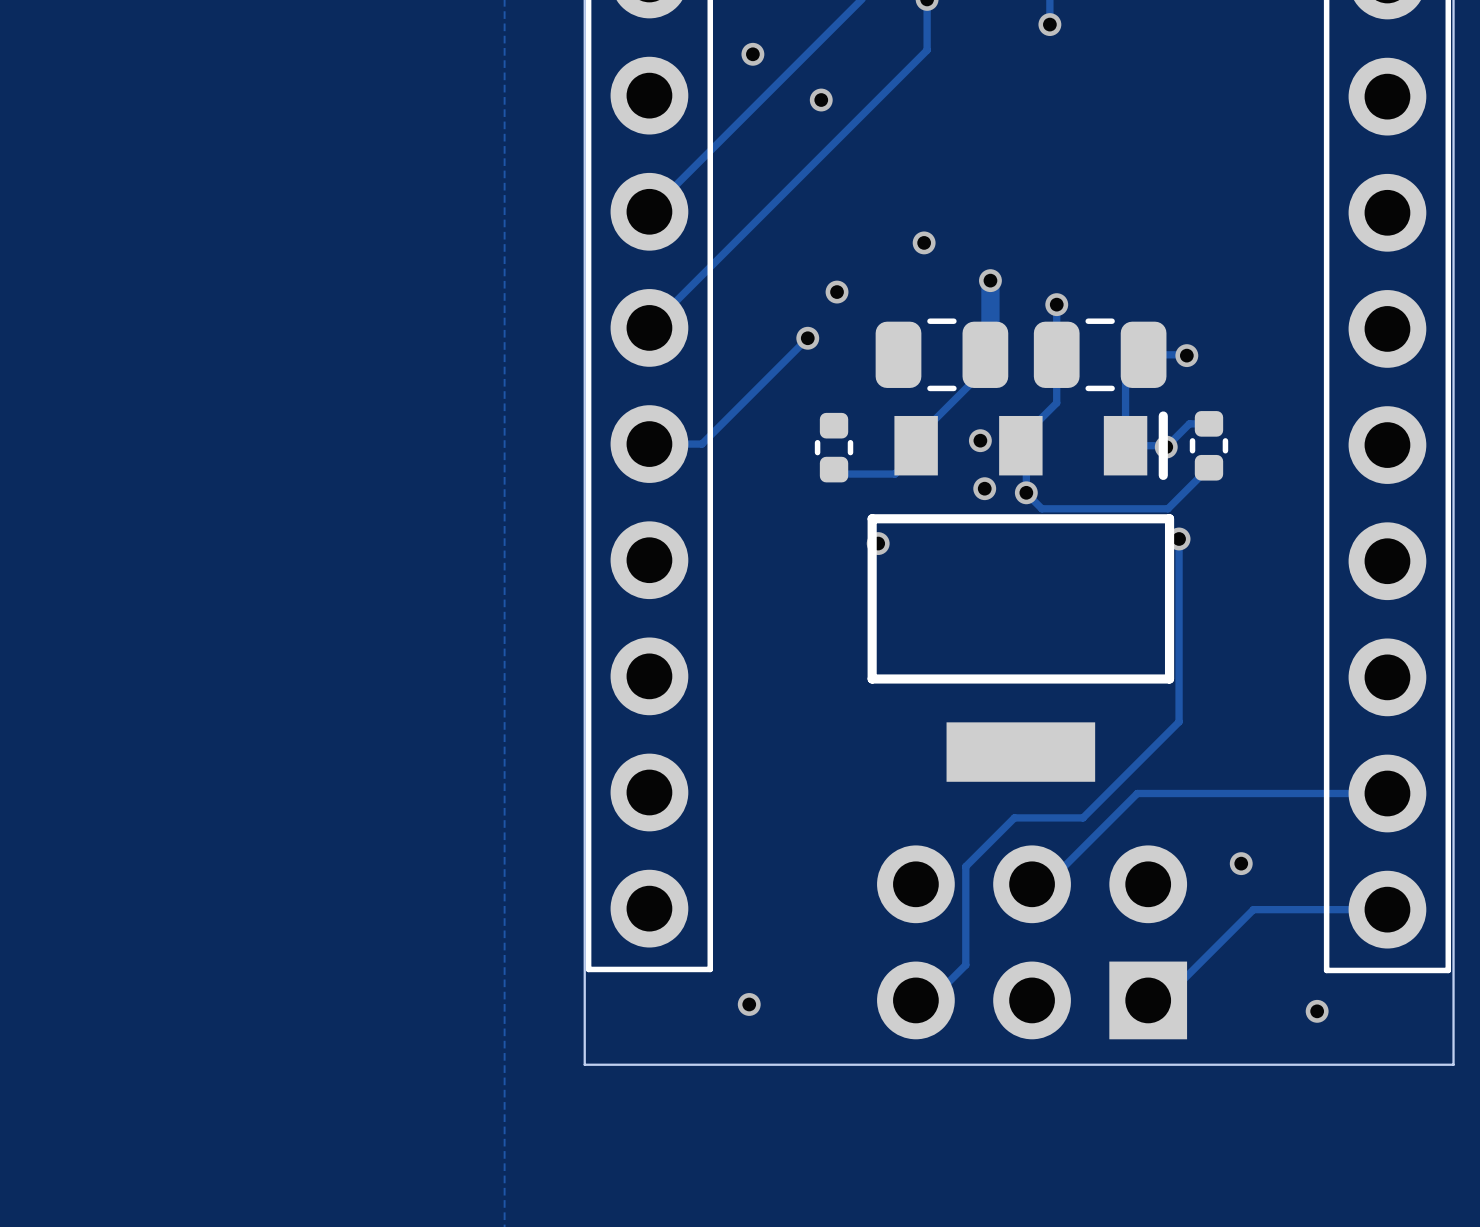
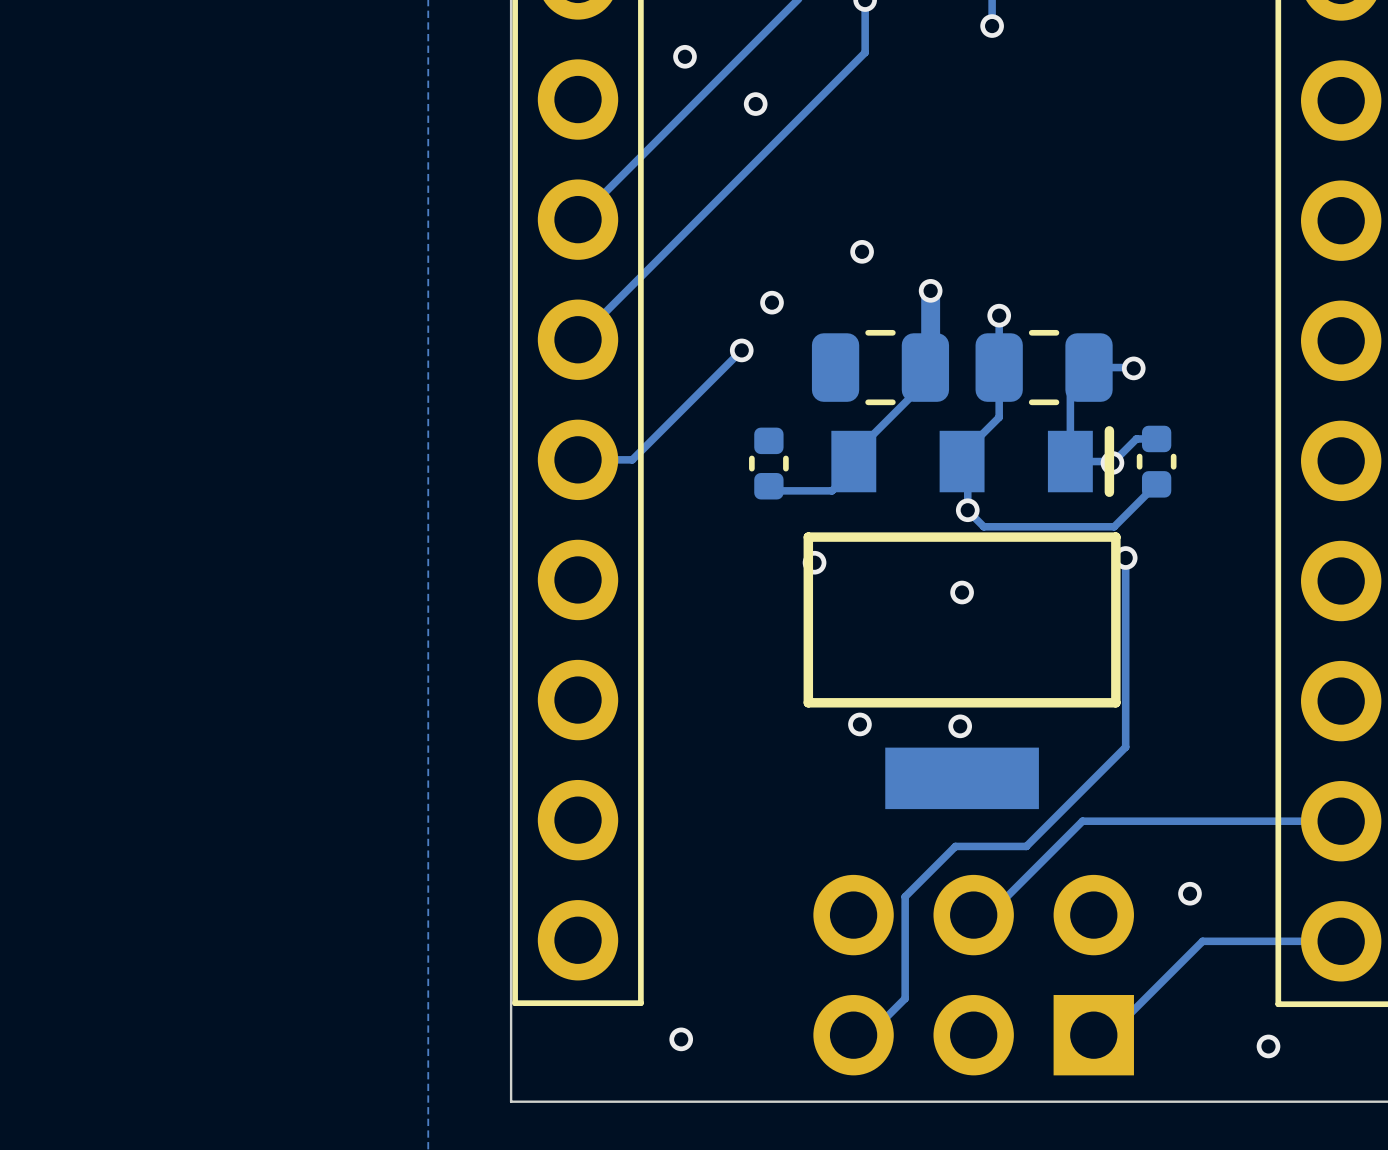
via: (980, 440) -> none
via: (984, 488) -> none
via: none -> (962, 592)
via: none -> (859, 724)
via: none -> (960, 726)

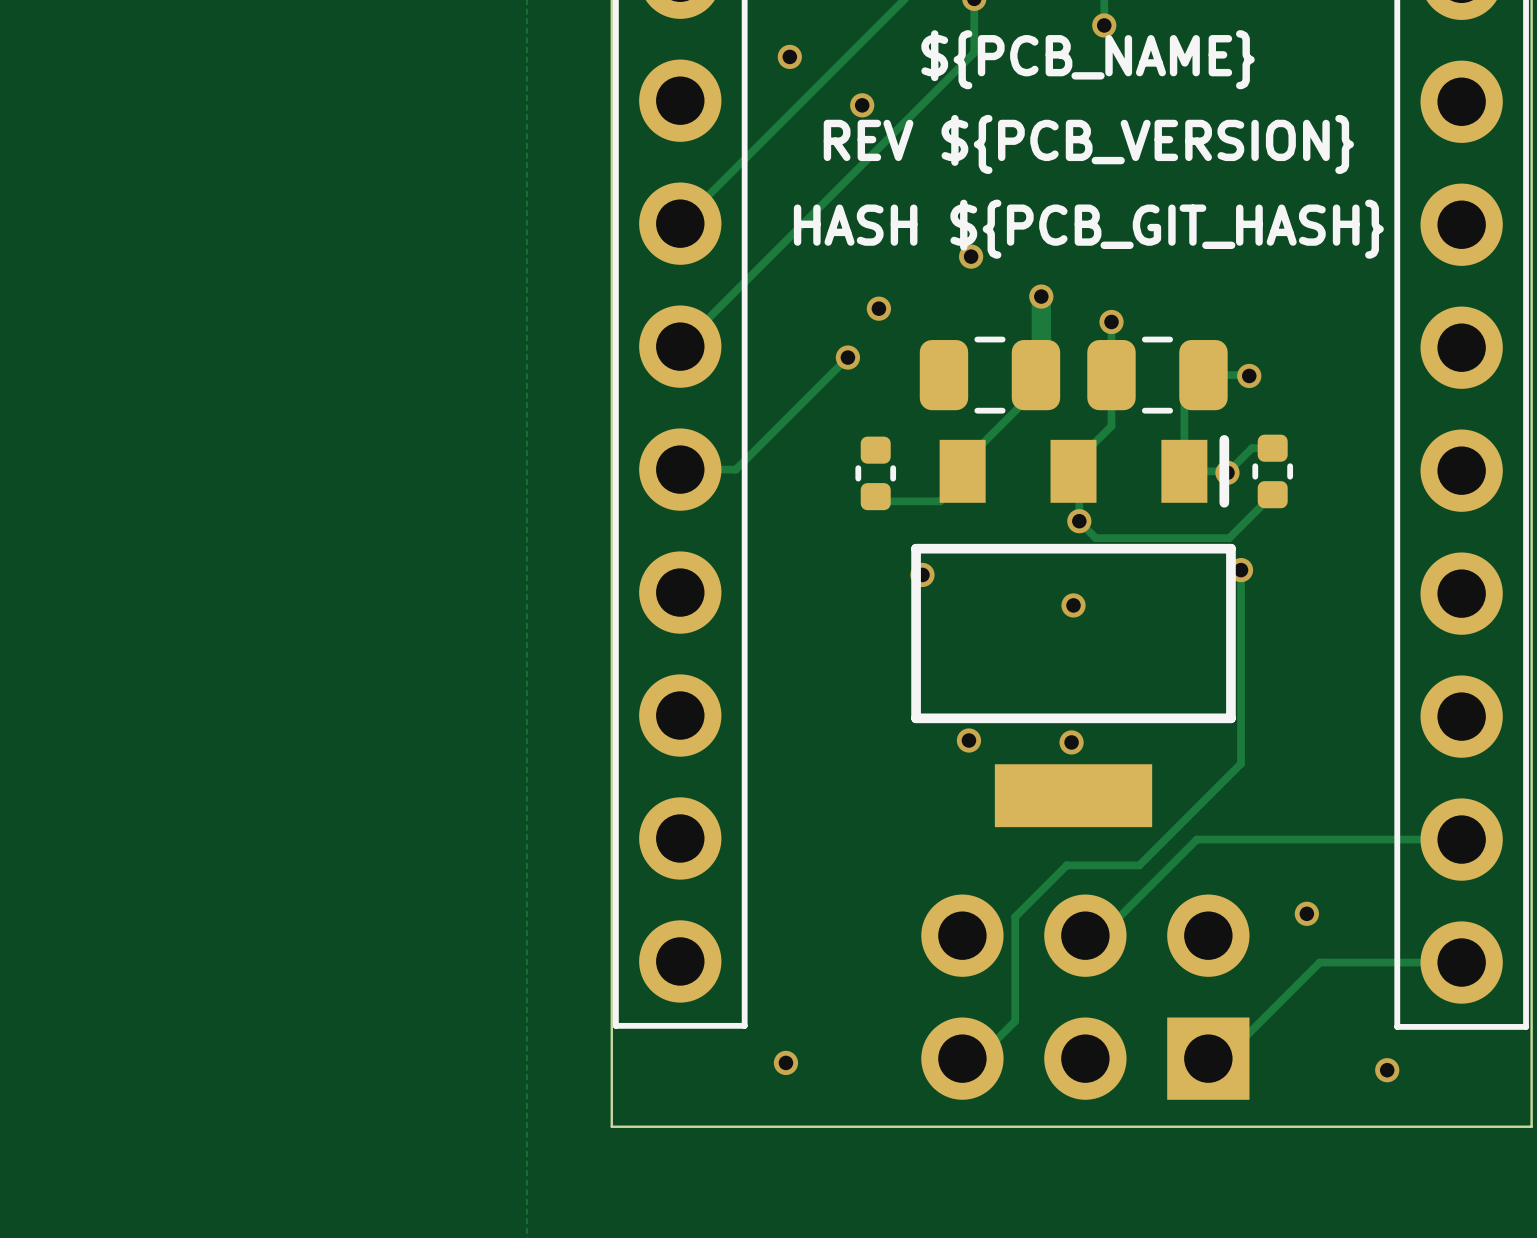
drawing: none -> [793, 30, 1384, 259]

